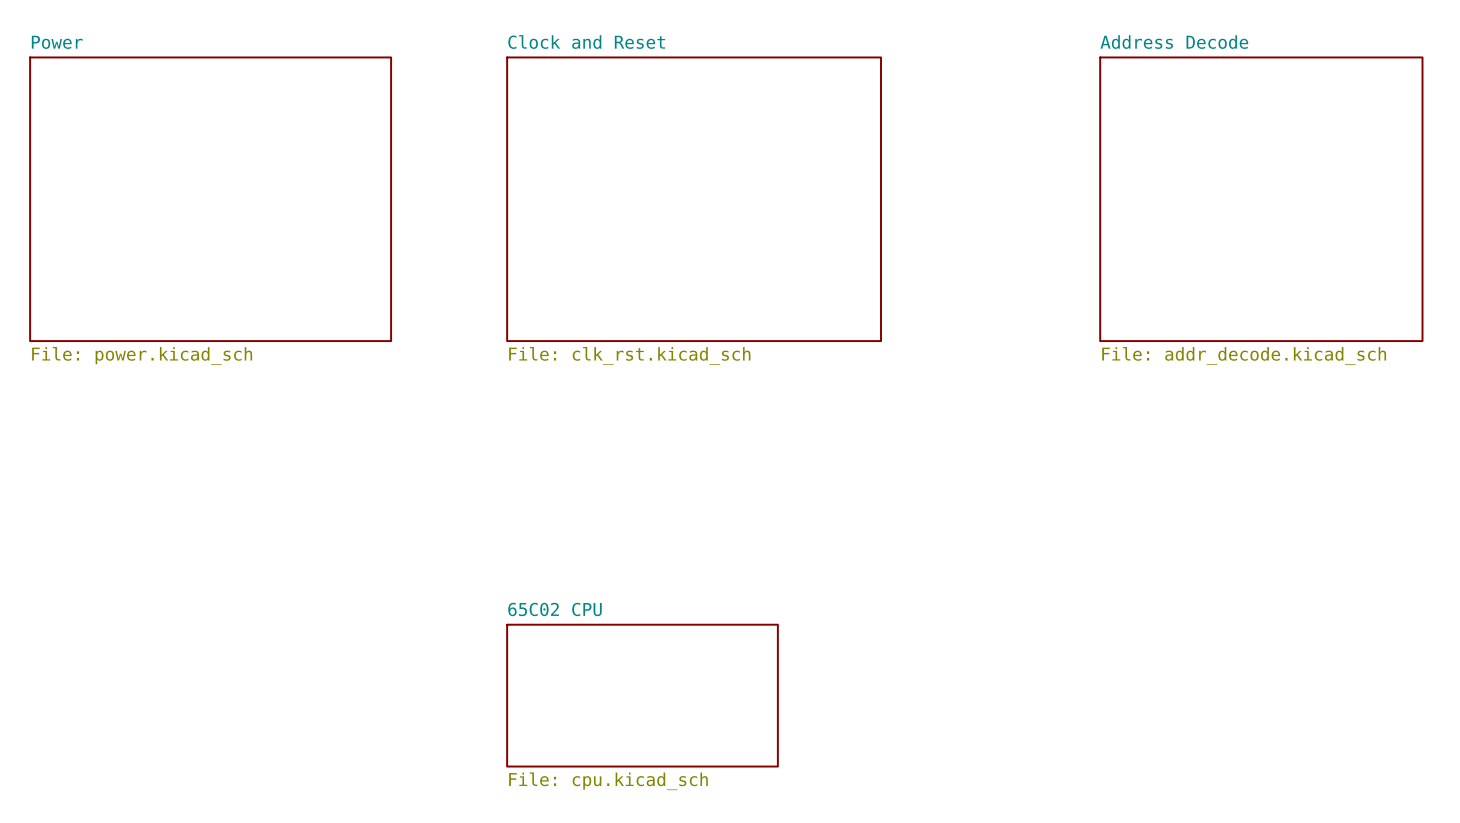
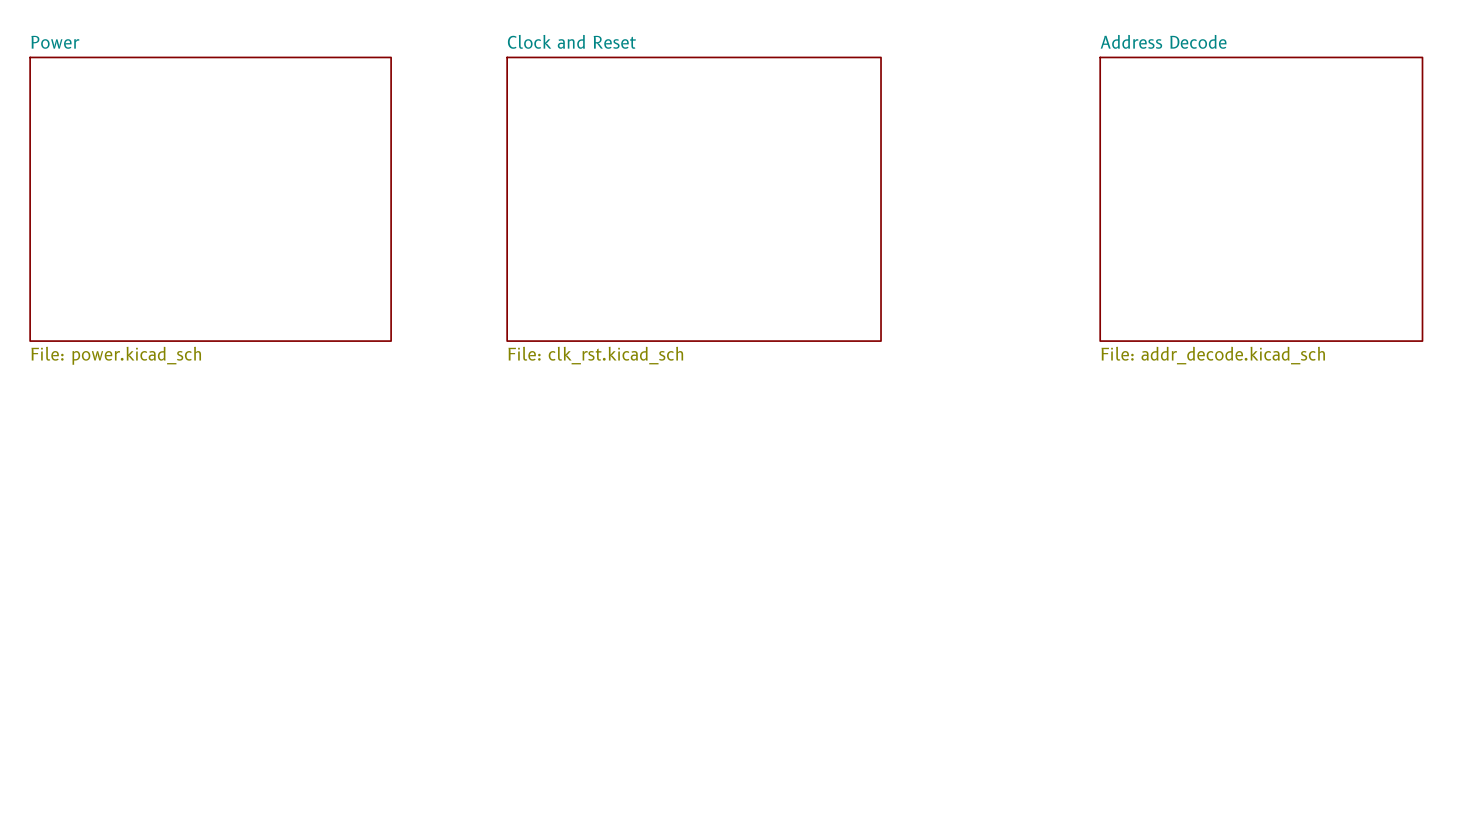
sheet 65C02 CPU: File: cpu.kicad_sch (642, 695) -> none

